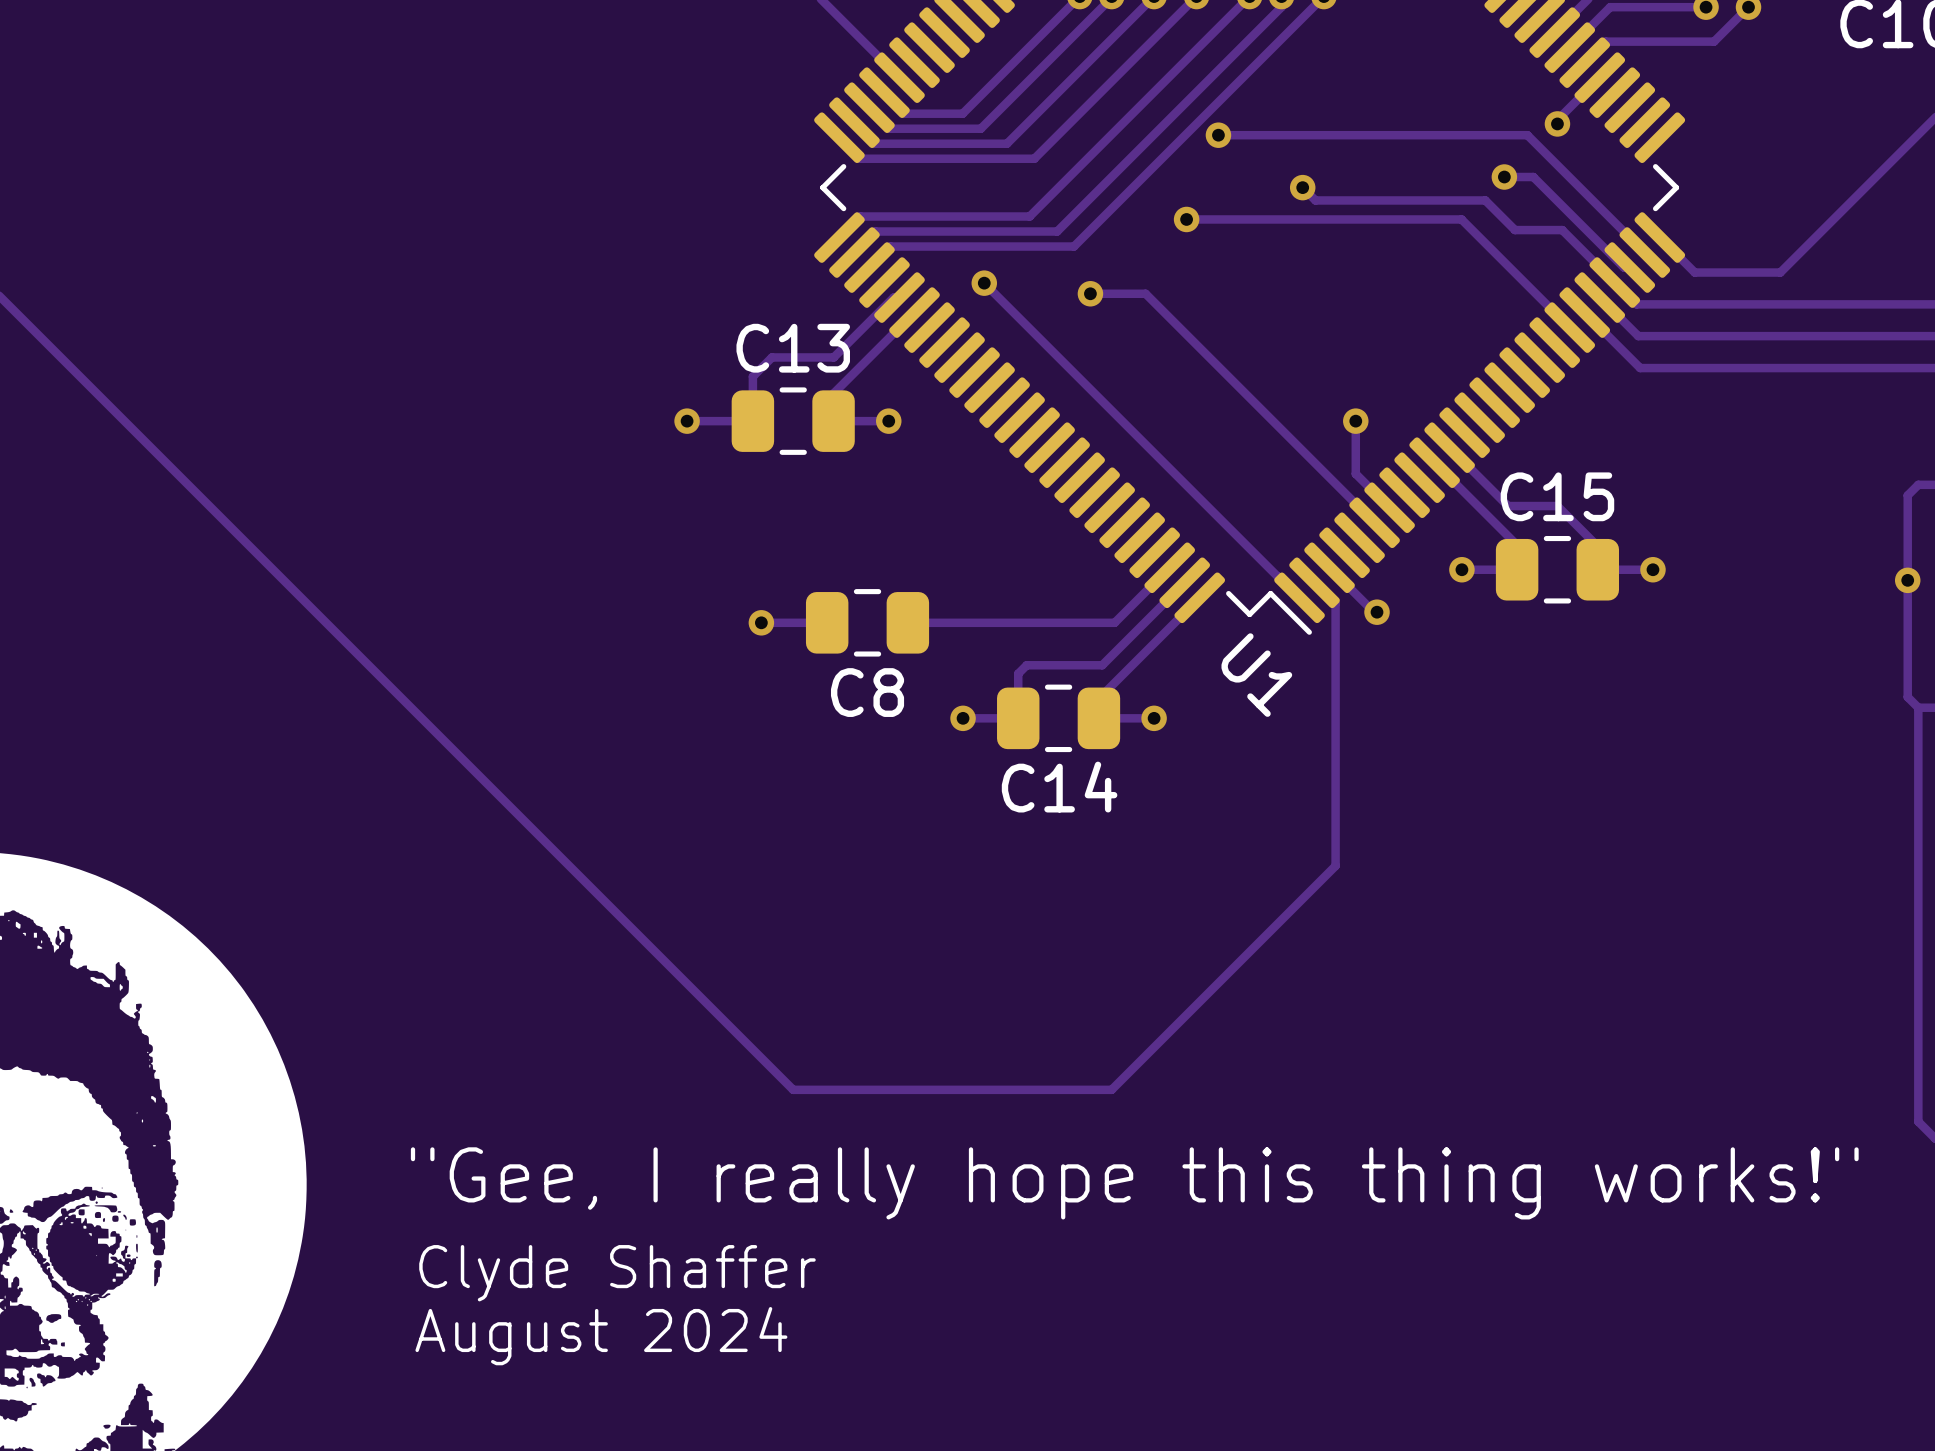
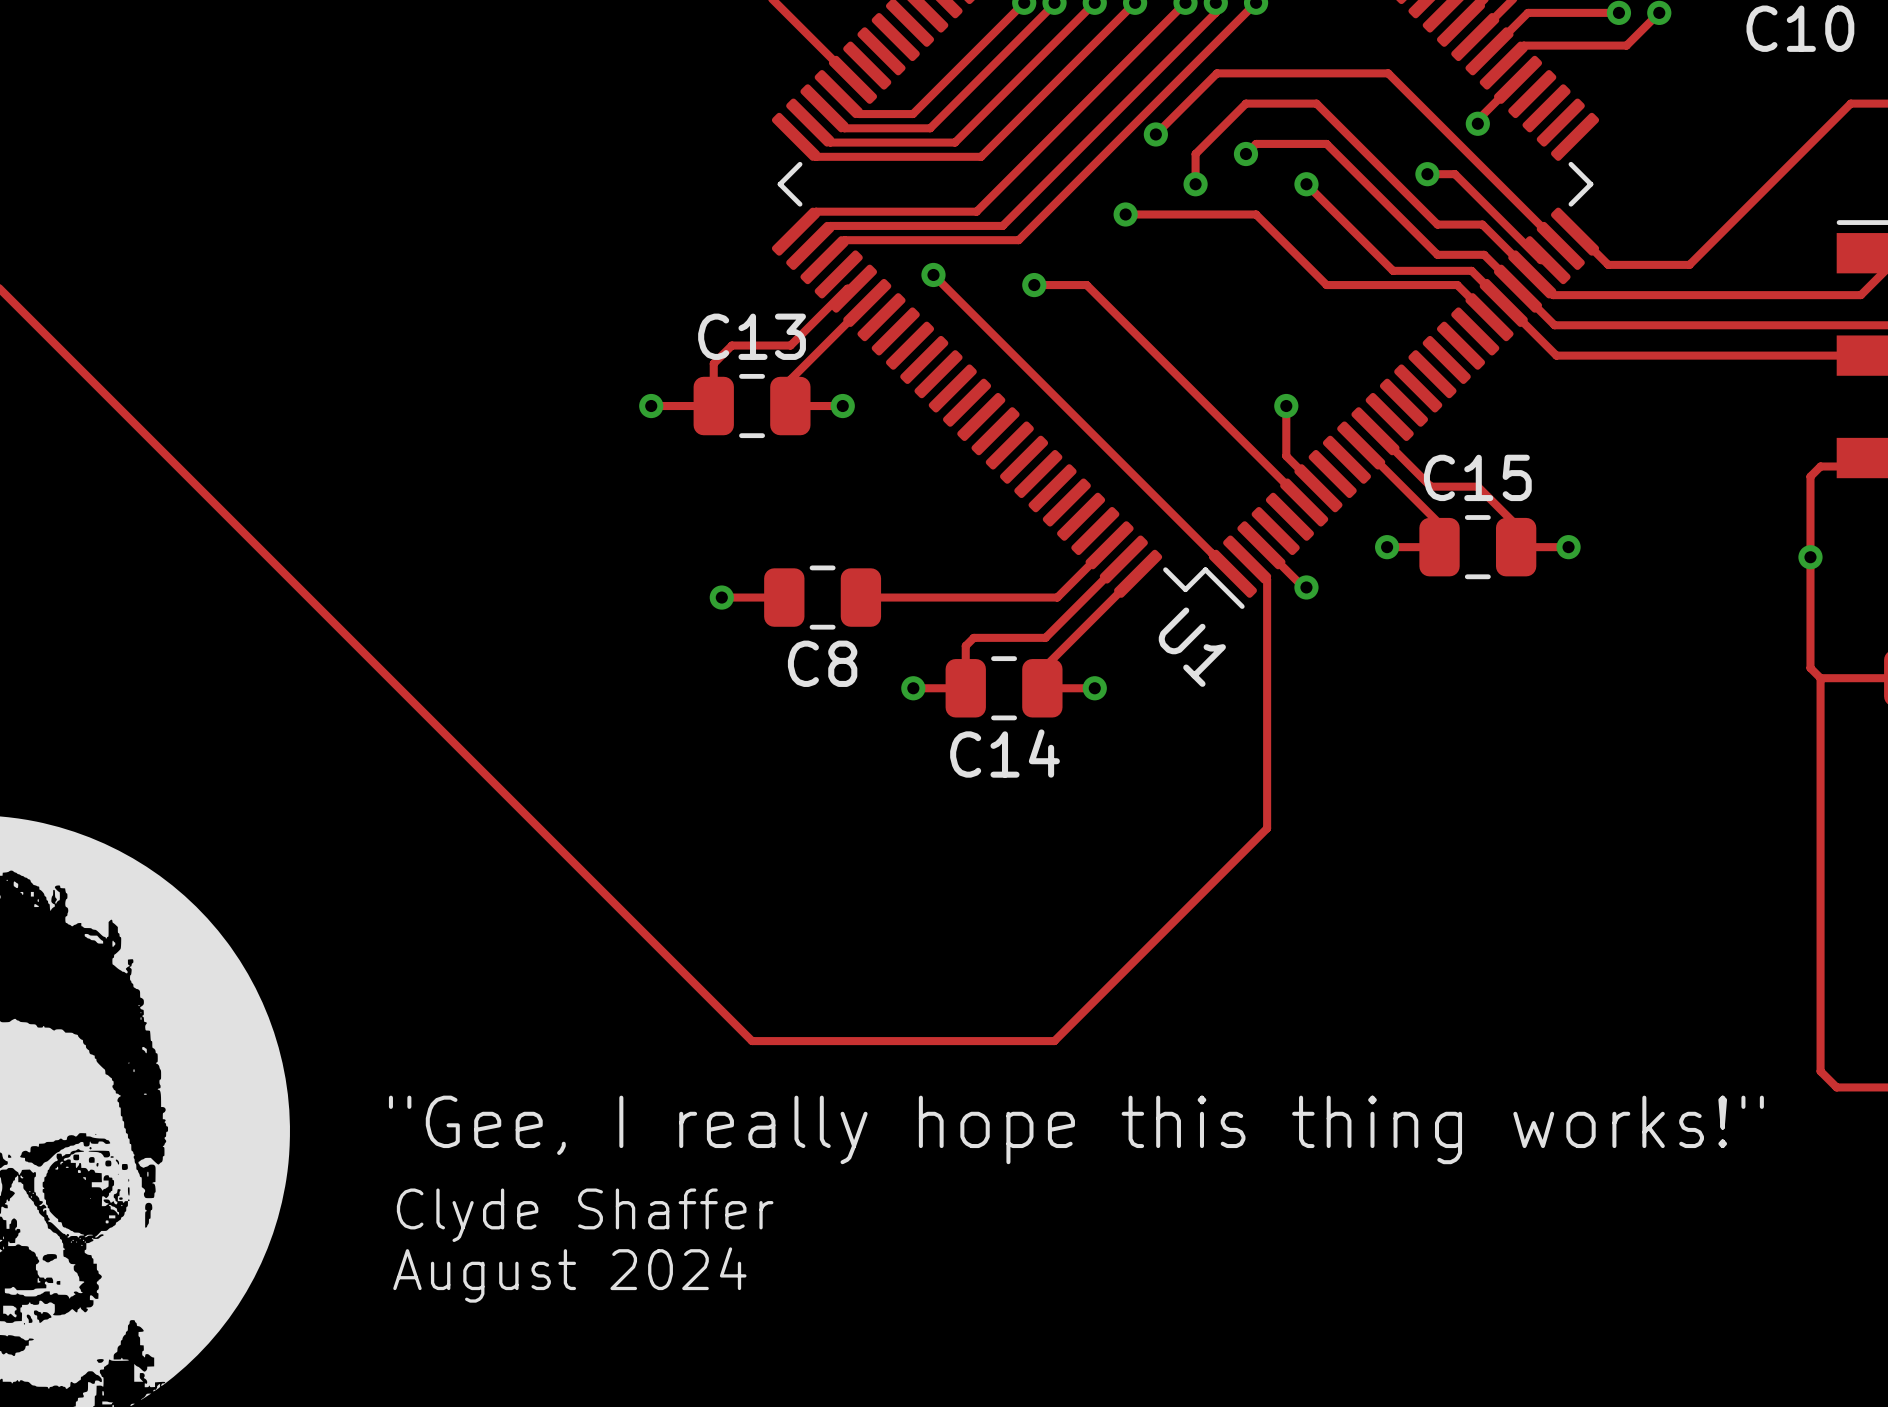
track: (1218, 135) (1527, 135) -> (1155, 134) (1216, 73) (1388, 73) (1449, 134)
track: none -> (1245, 154) (1256, 143) (1326, 143) (1437, 254) (1484, 254) (1518, 288)
via: none -> (1245, 154)
via: none -> (1195, 184)
track: (1302, 187) (1315, 200) (1485, 200) -> (1195, 184) (1195, 154) (1245, 103) (1316, 103) (1409, 196)
via: (1302, 187) -> none
track: none -> (1306, 184) (1393, 270) (1471, 270) (1503, 302)
via: none -> (1306, 184)
track: (1323, 219) (1461, 219) (1535, 293) -> (1256, 214) (1326, 285) (1457, 285)

